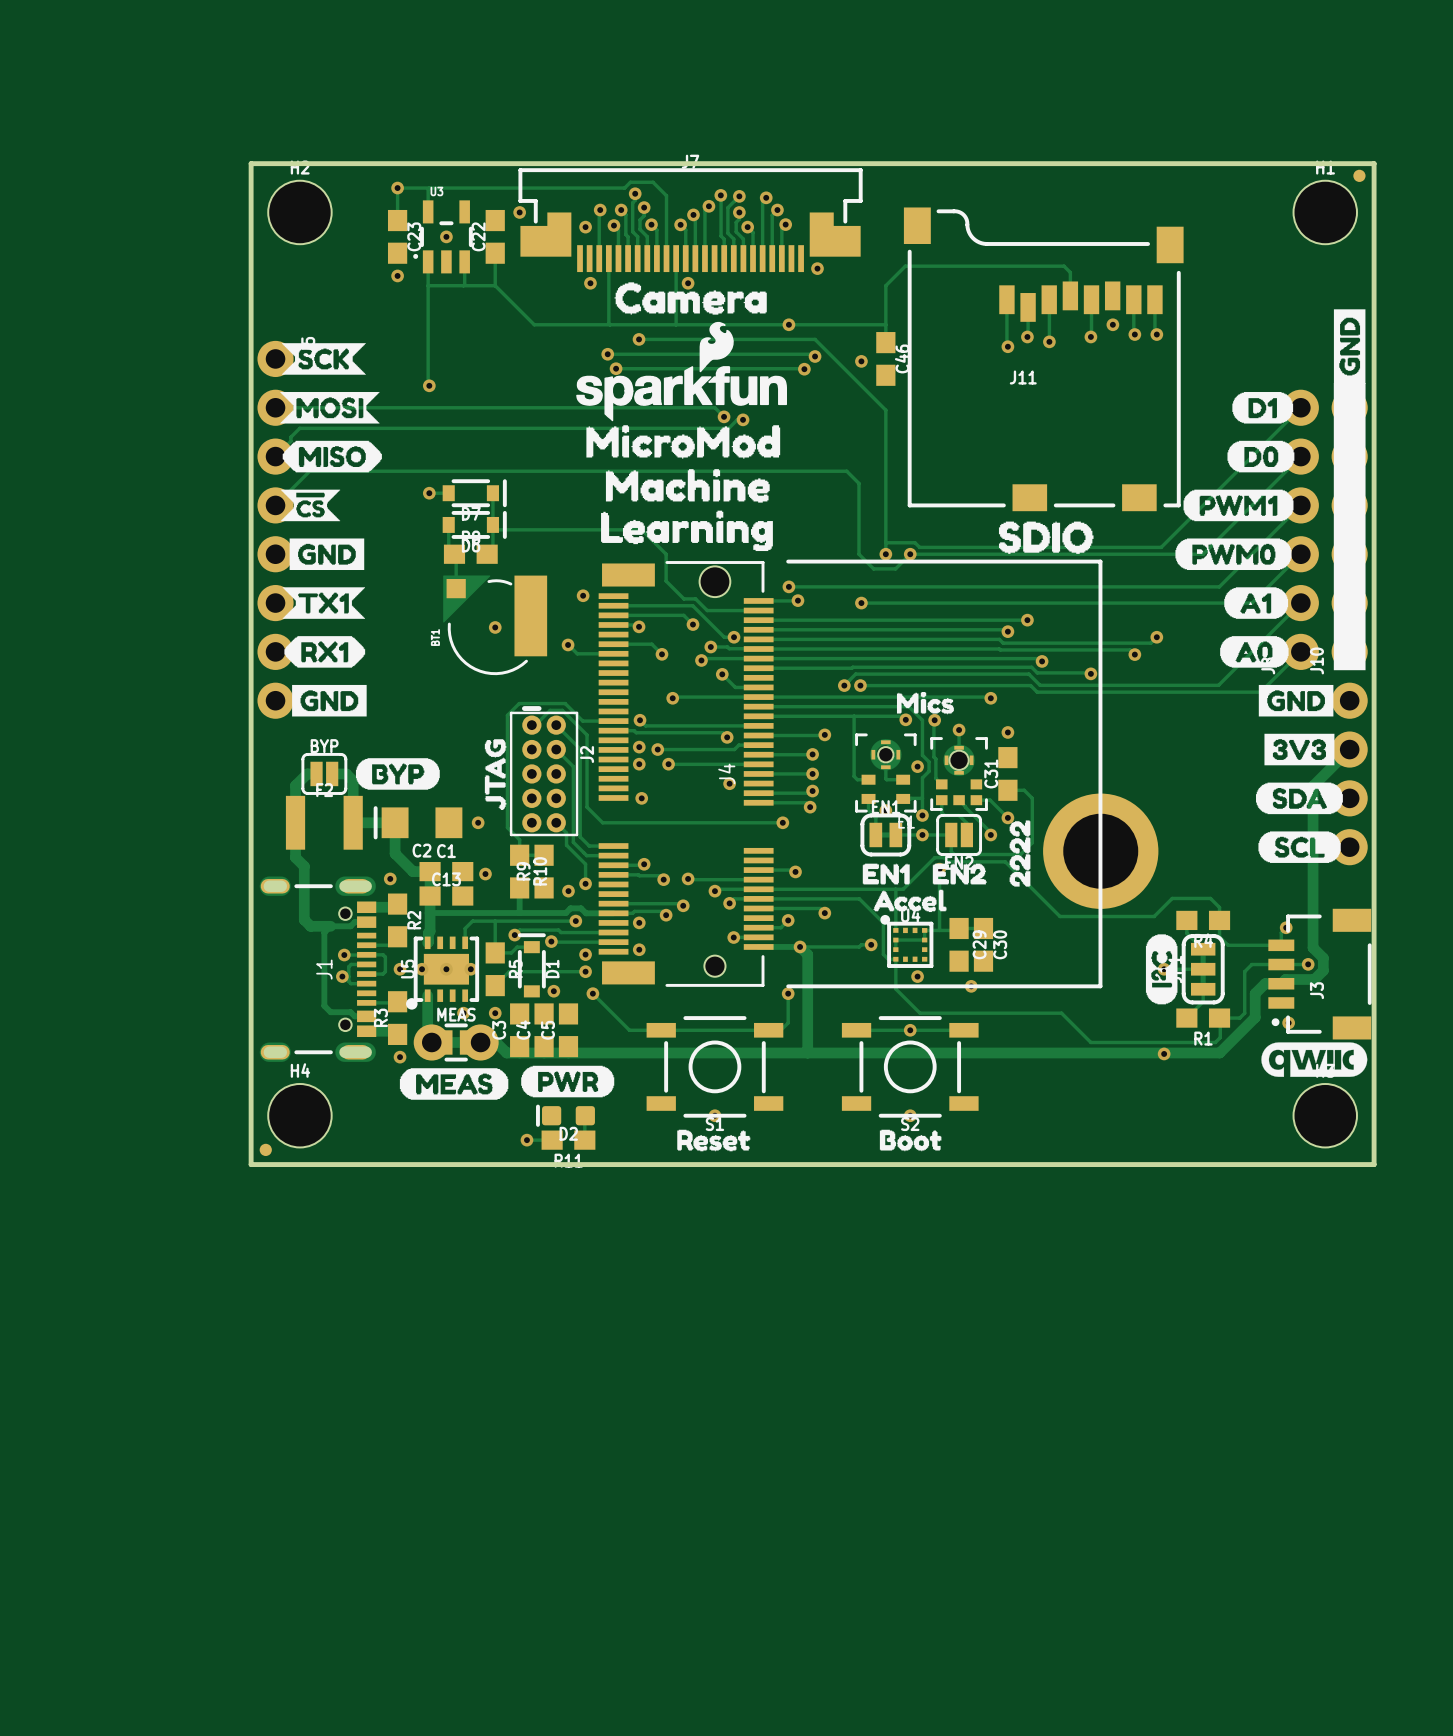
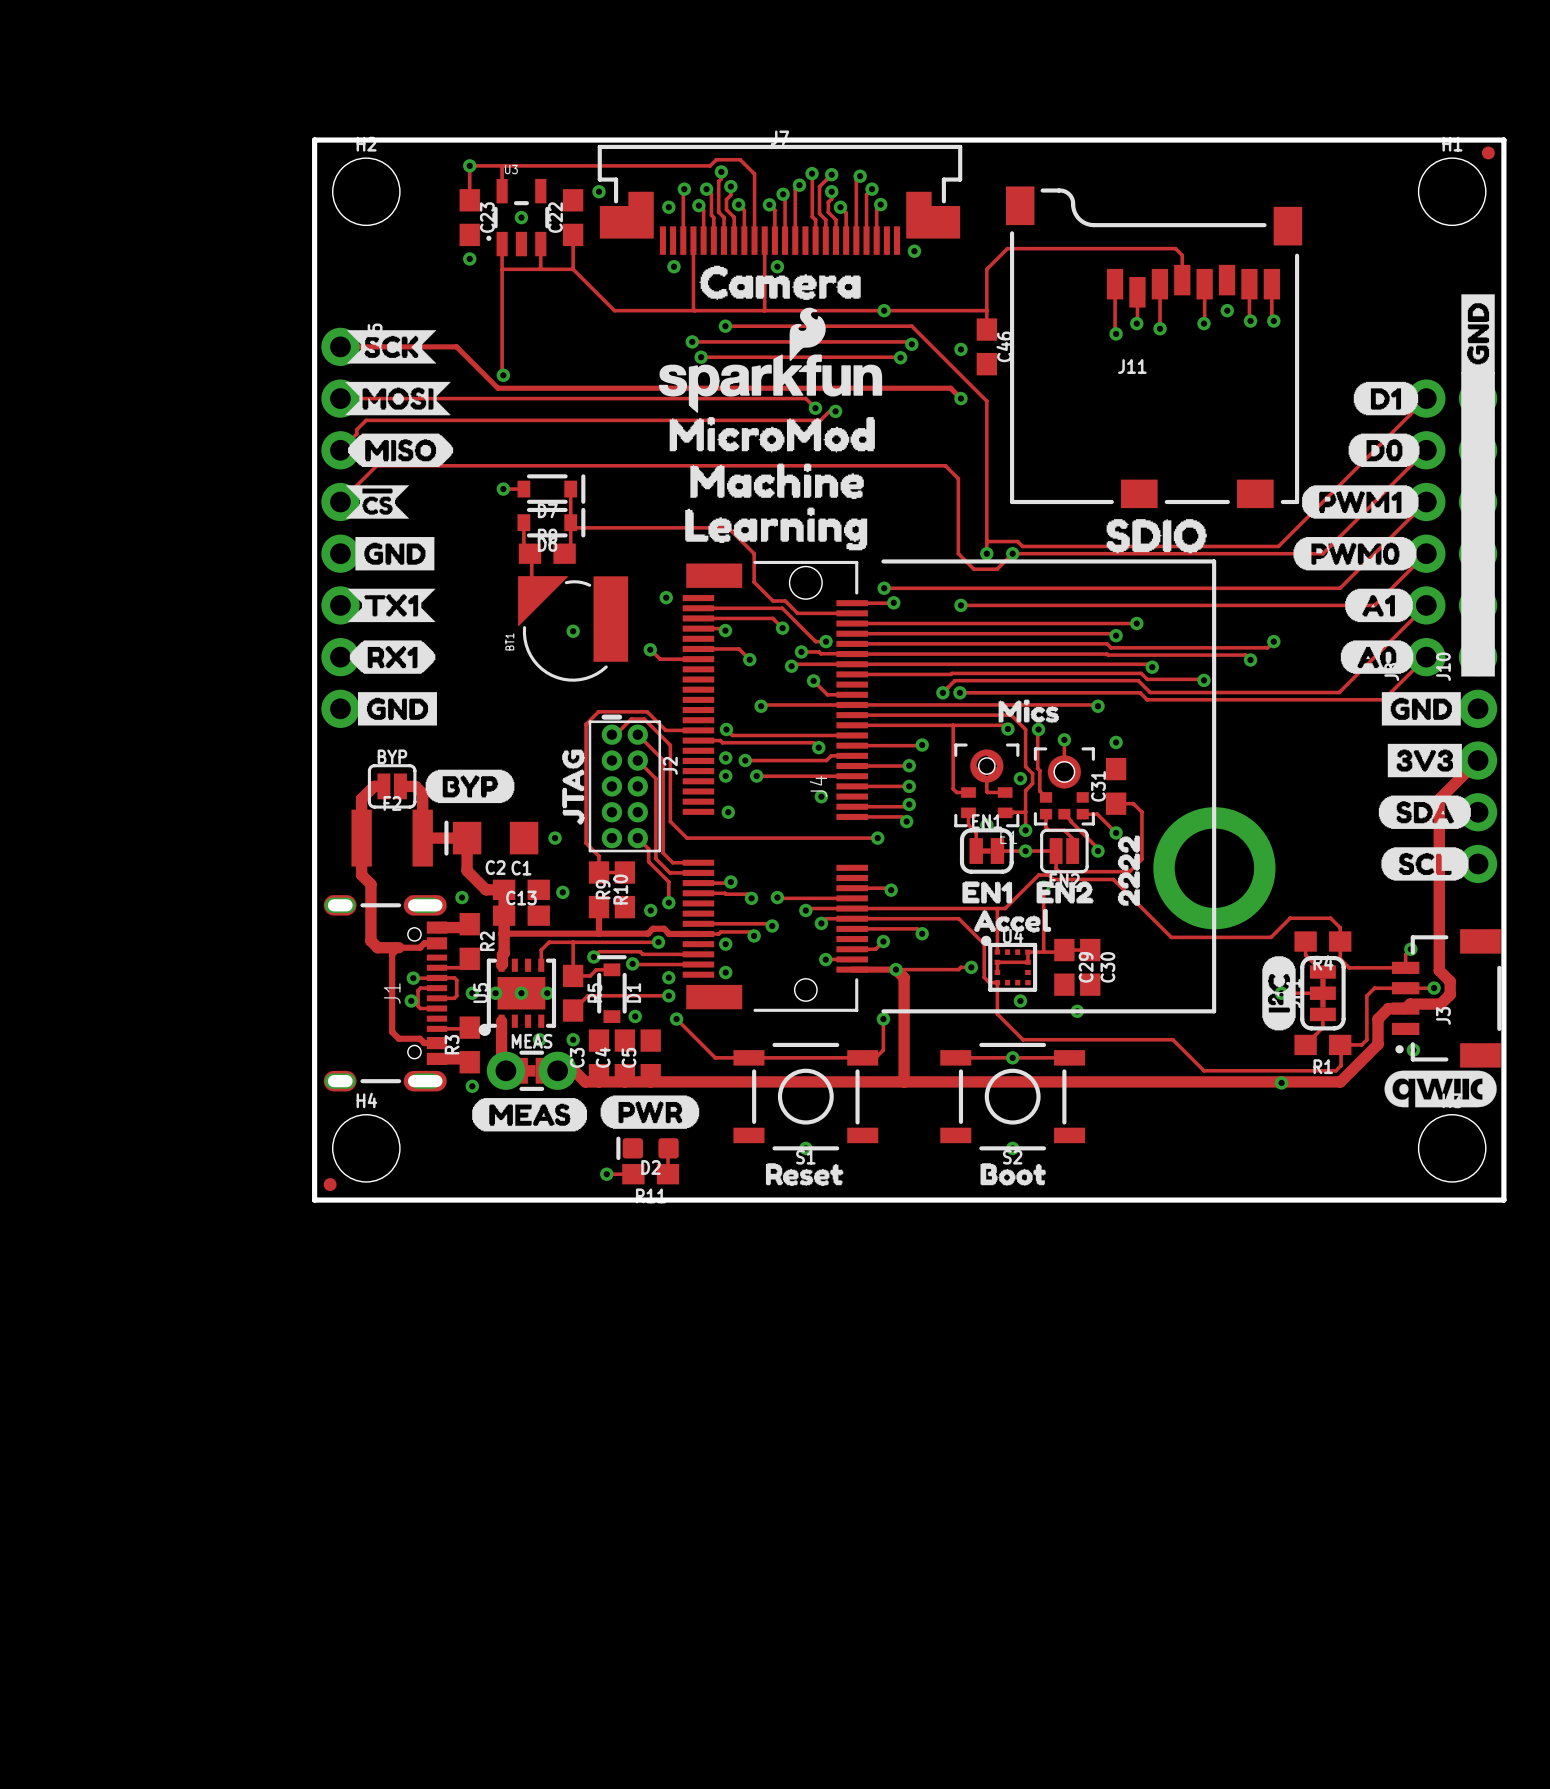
track: none -> (340, 346) (456, 346) (497, 388) (950, 388) (960, 398)
via: none -> (960, 398)

